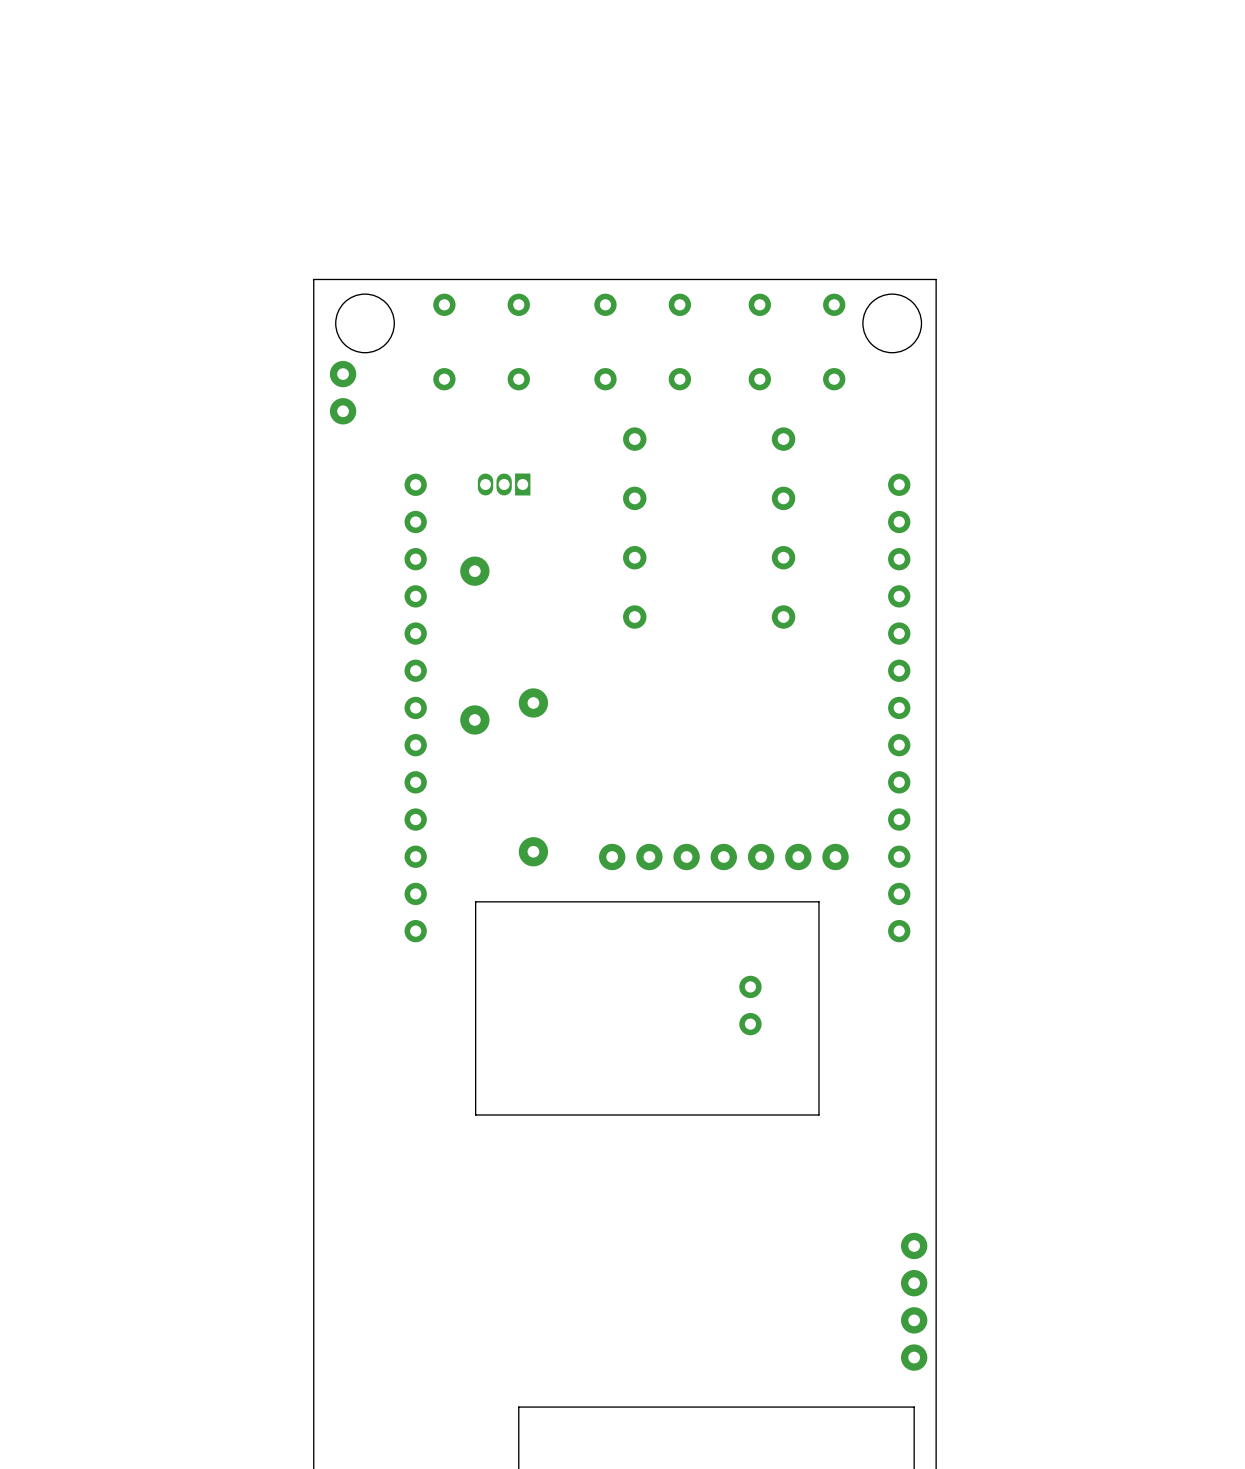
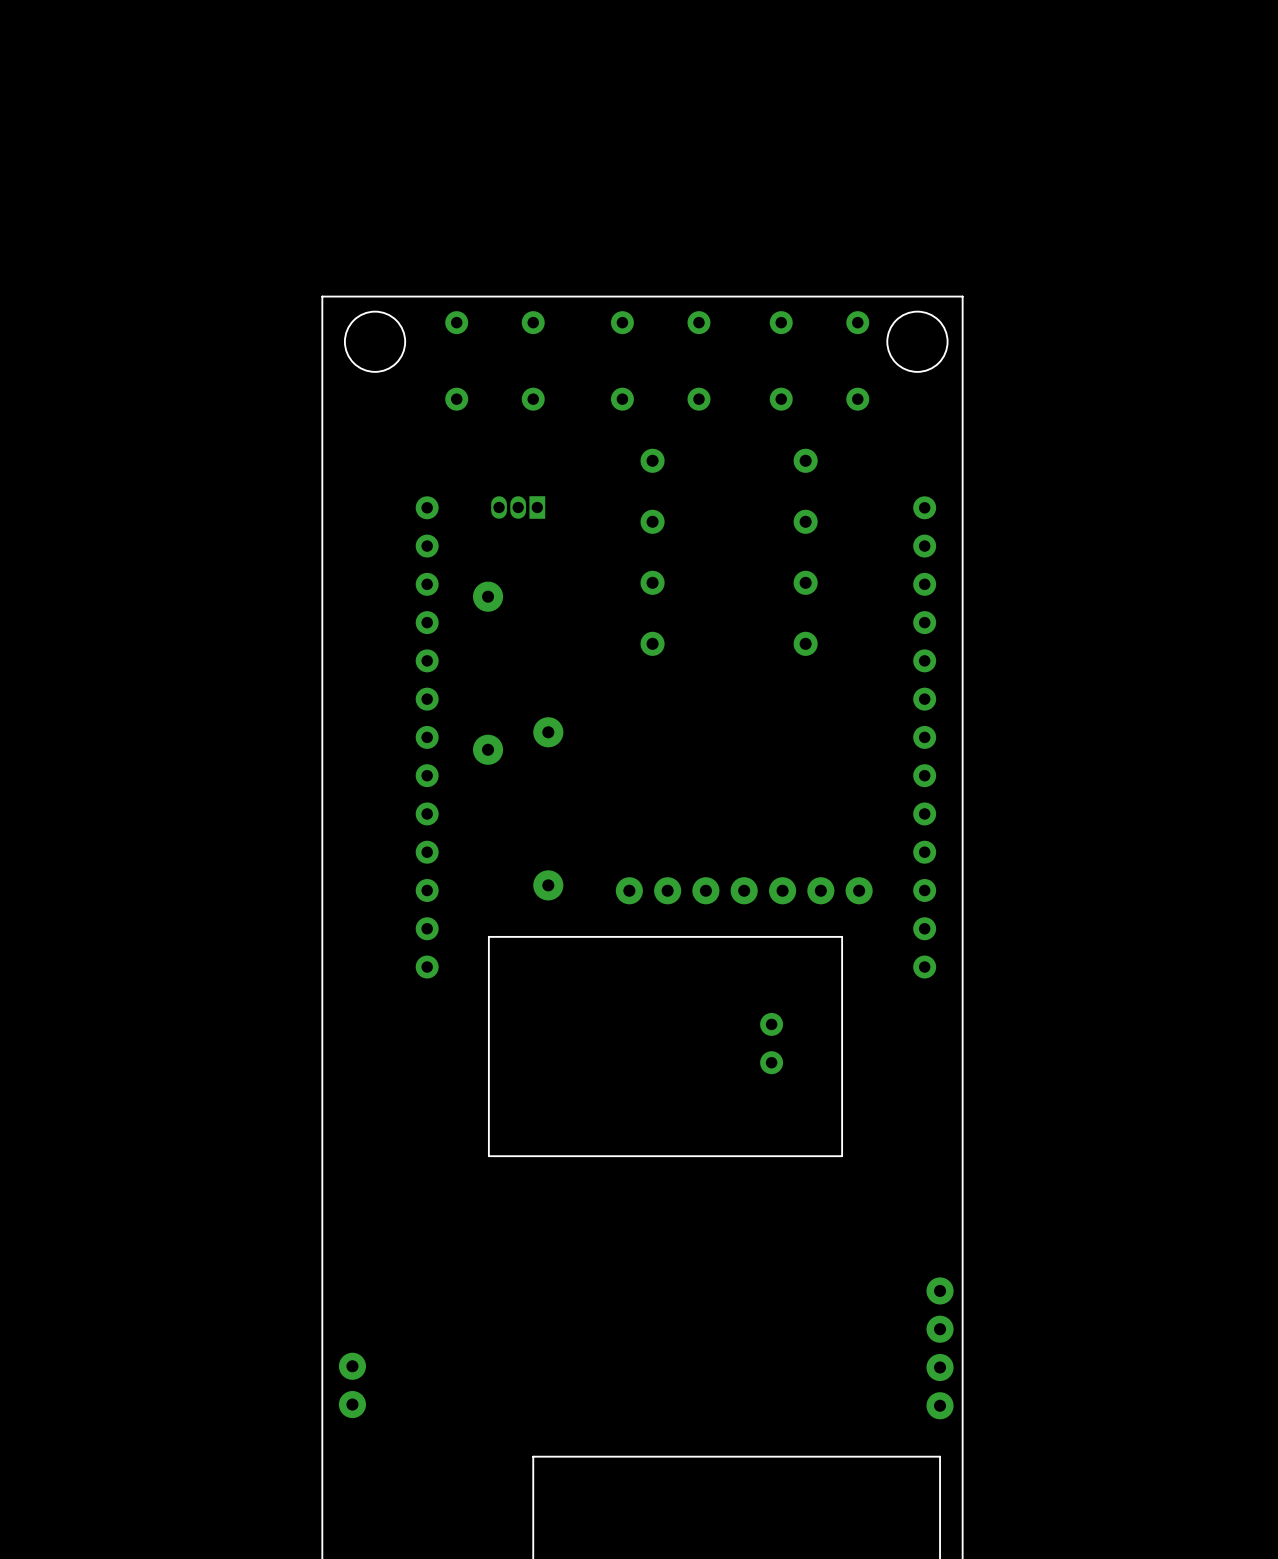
part: (343, 392) -> none
part: none -> (352, 1385)

